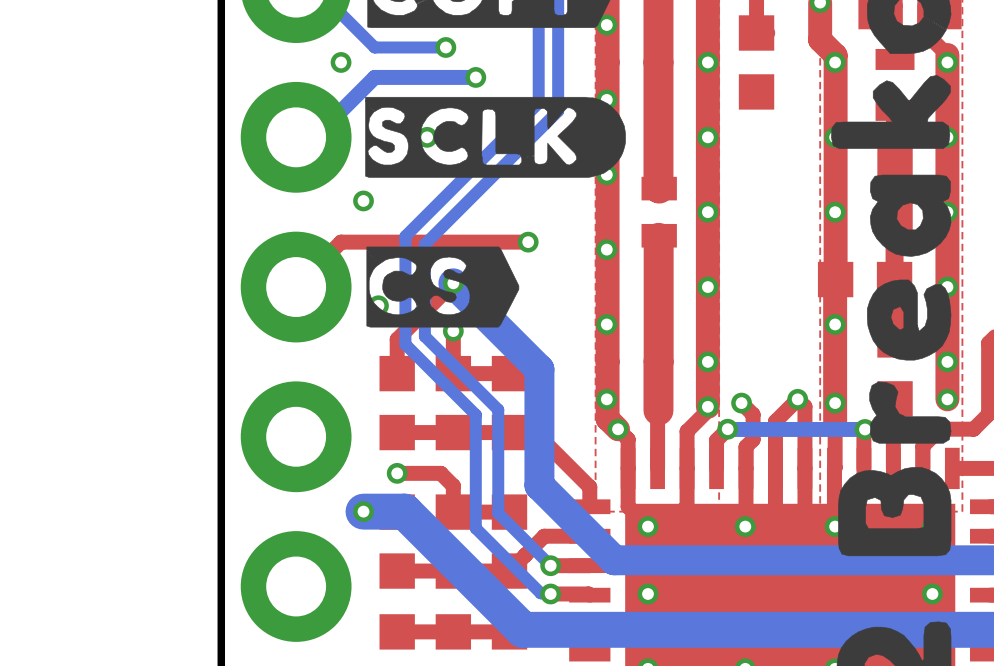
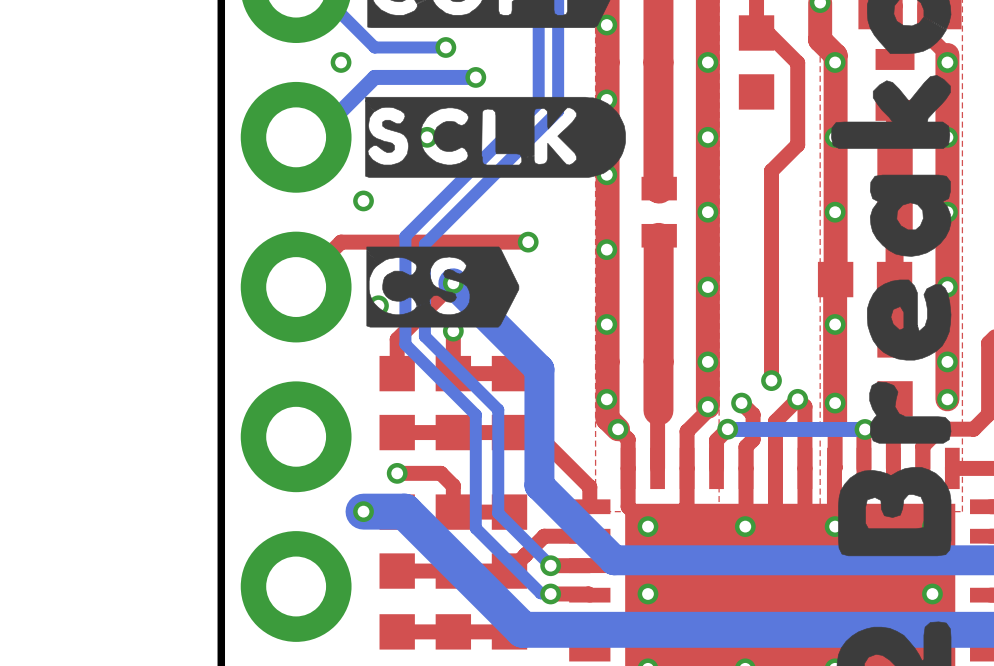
top track: none -> (767, 32) (797, 62) (797, 144) (771, 171) (771, 380)
via position: (528, 242) -> (771, 380)

